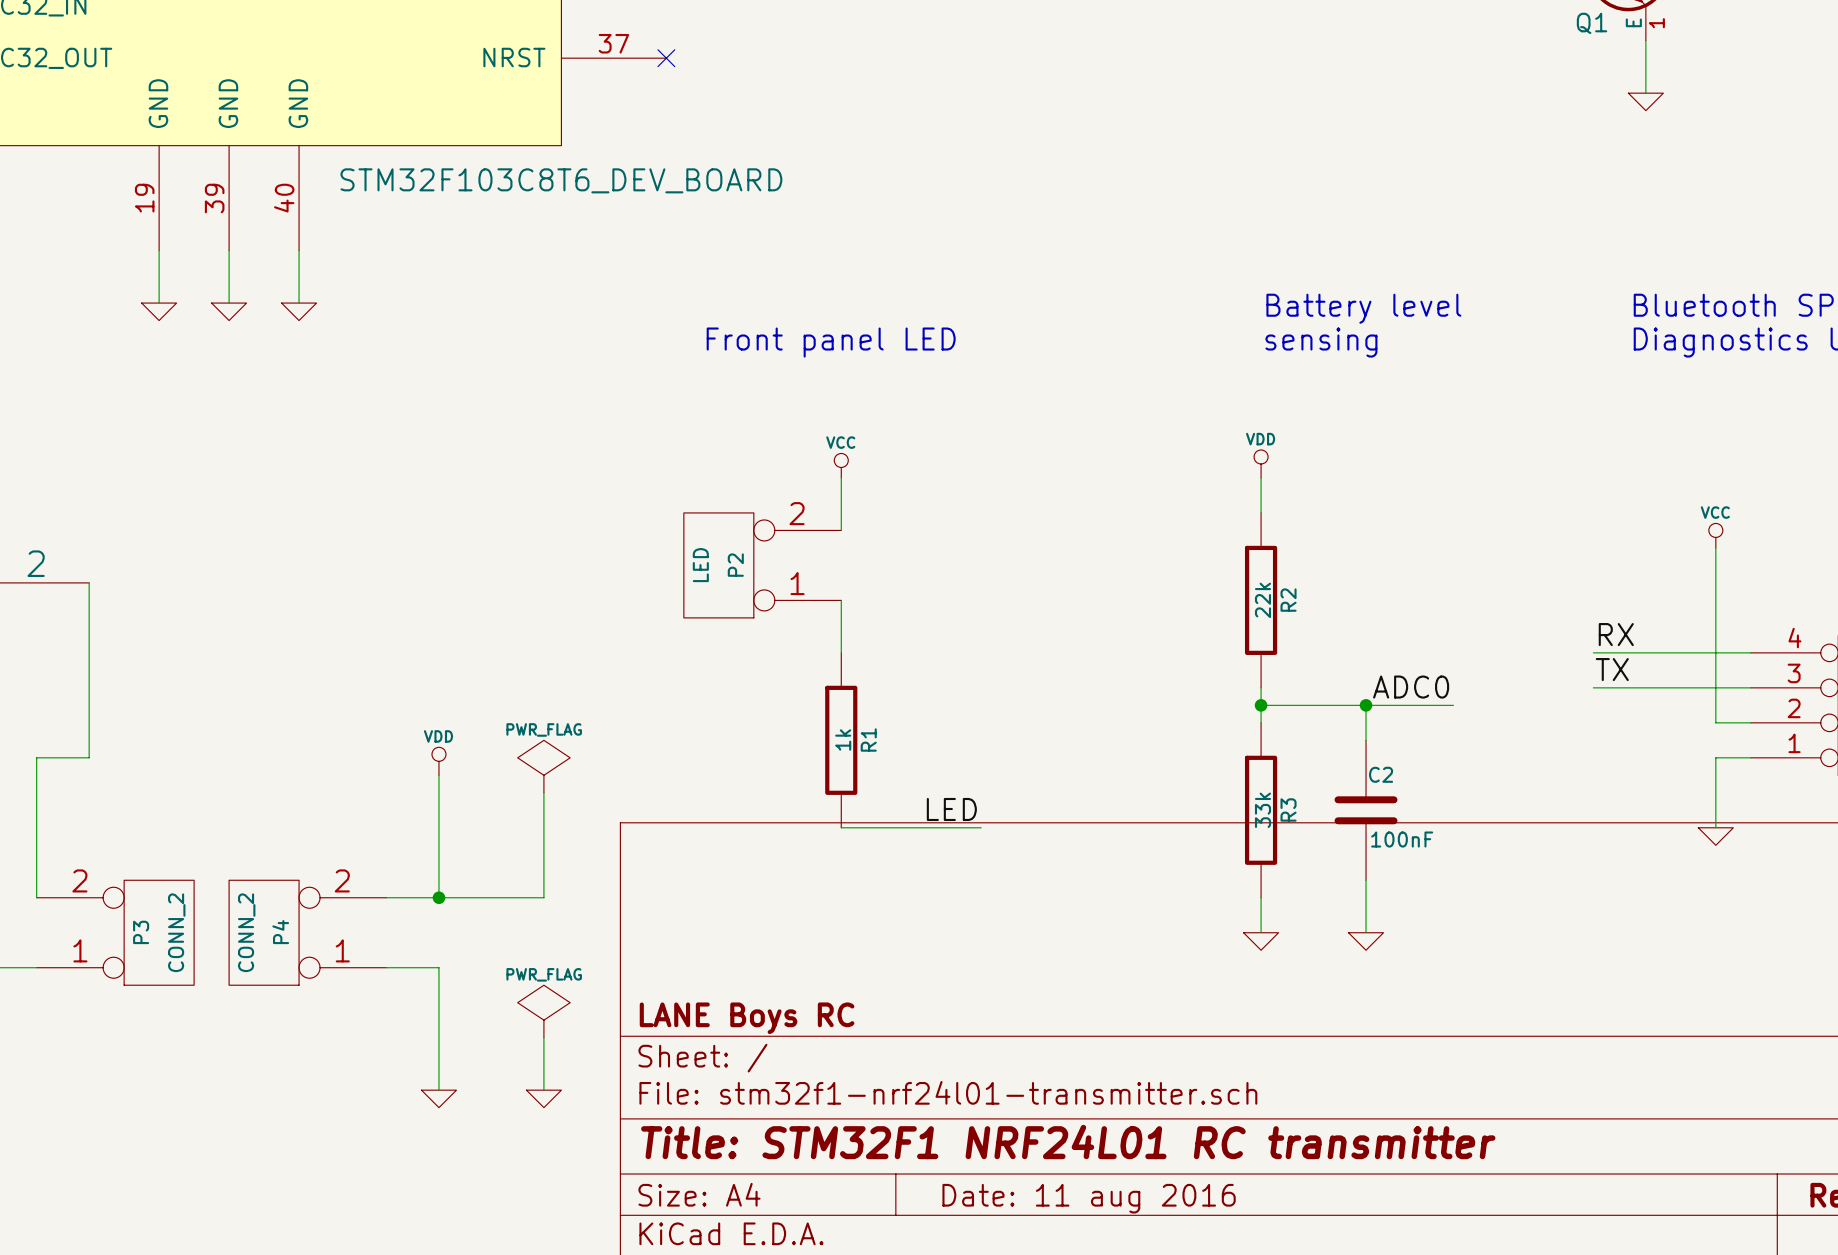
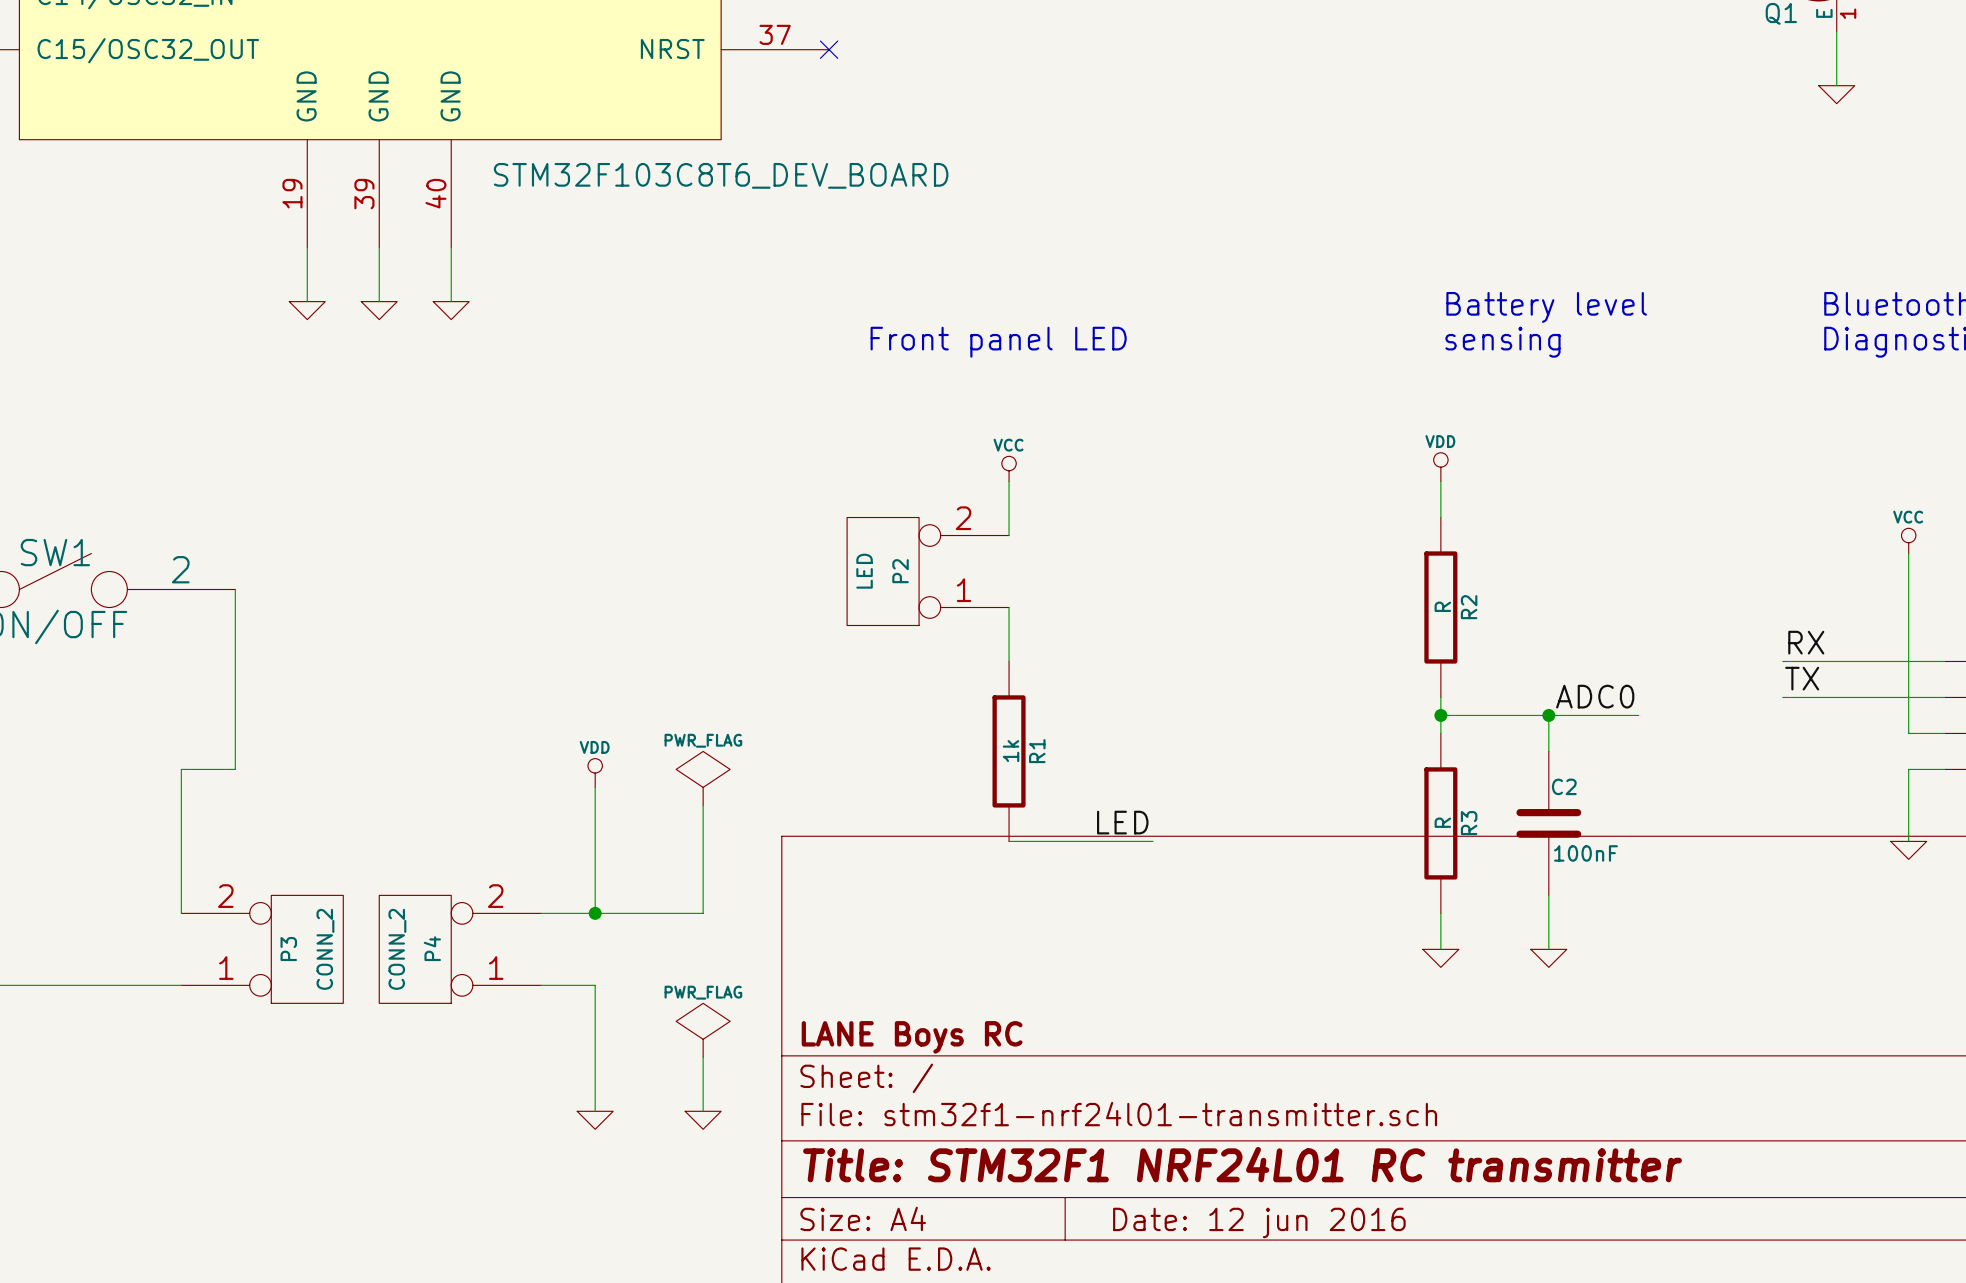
R2 value: 22k (1262, 600) -> R (1442, 606)
R3 value: 33k (1262, 810) -> R (1442, 822)
title block: Date: 11 aug 2016 (1089, 1198) -> Date: 12 jun 2016 (1259, 1222)

